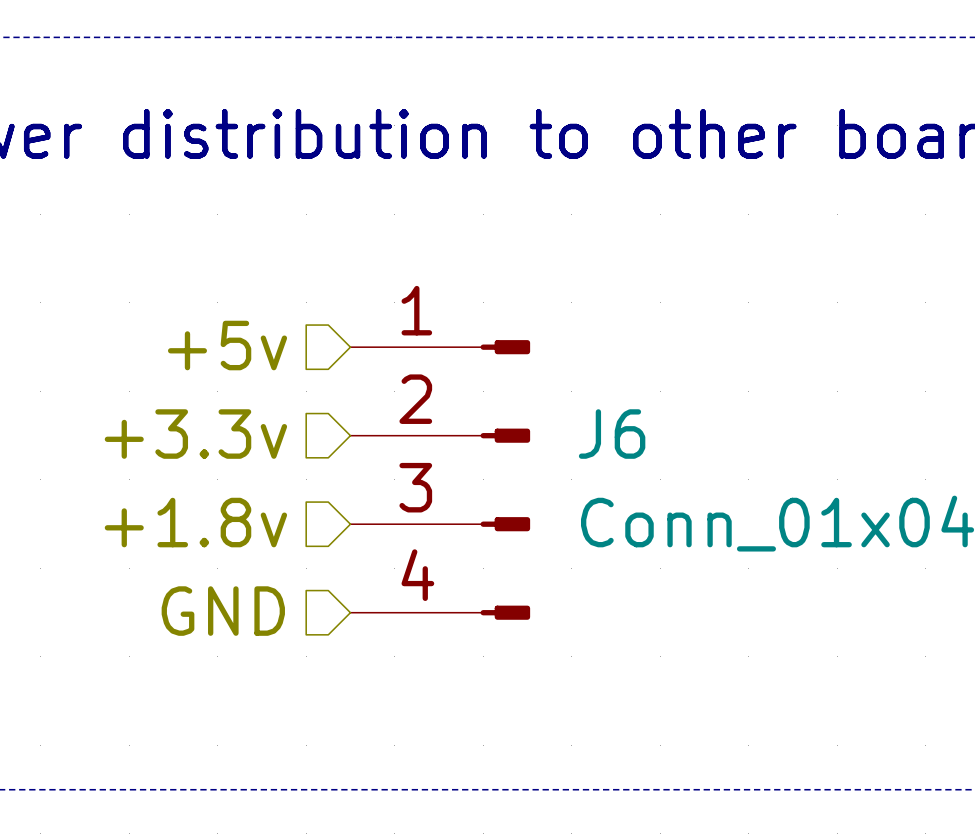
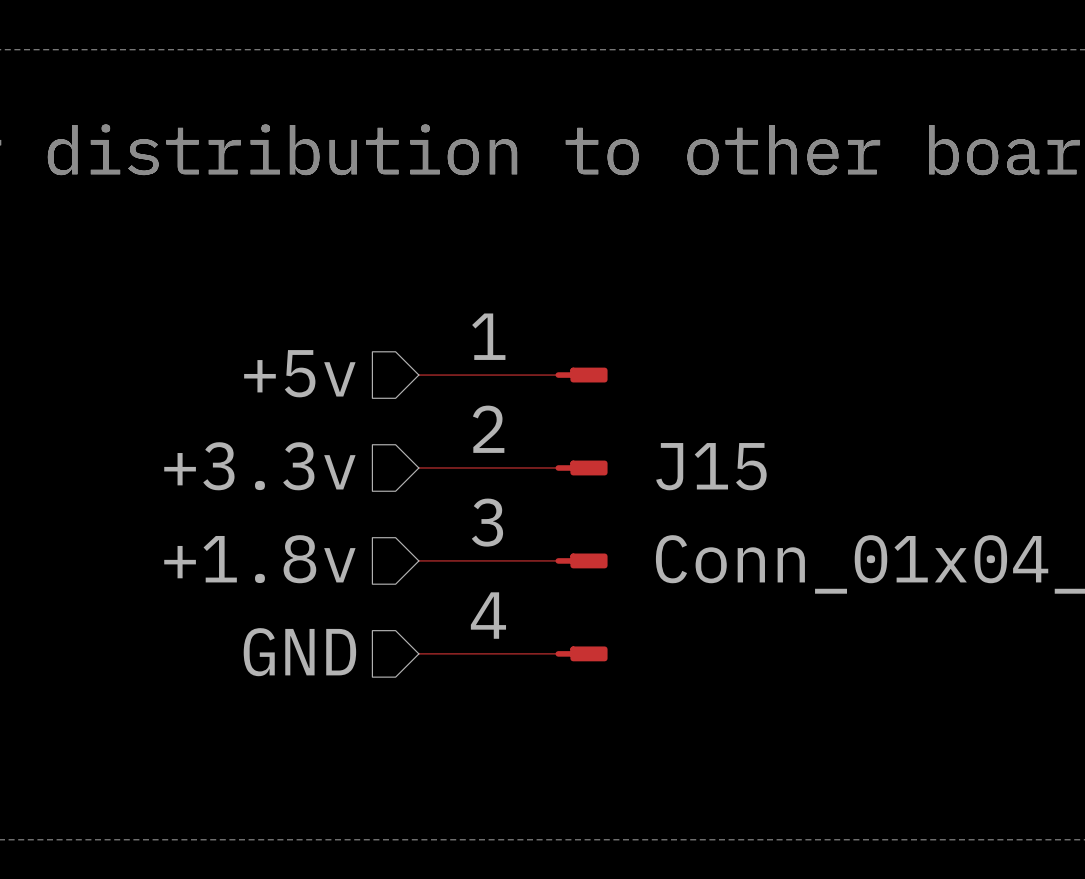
J6 name: J6 (612, 434) -> J15 (711, 466)

